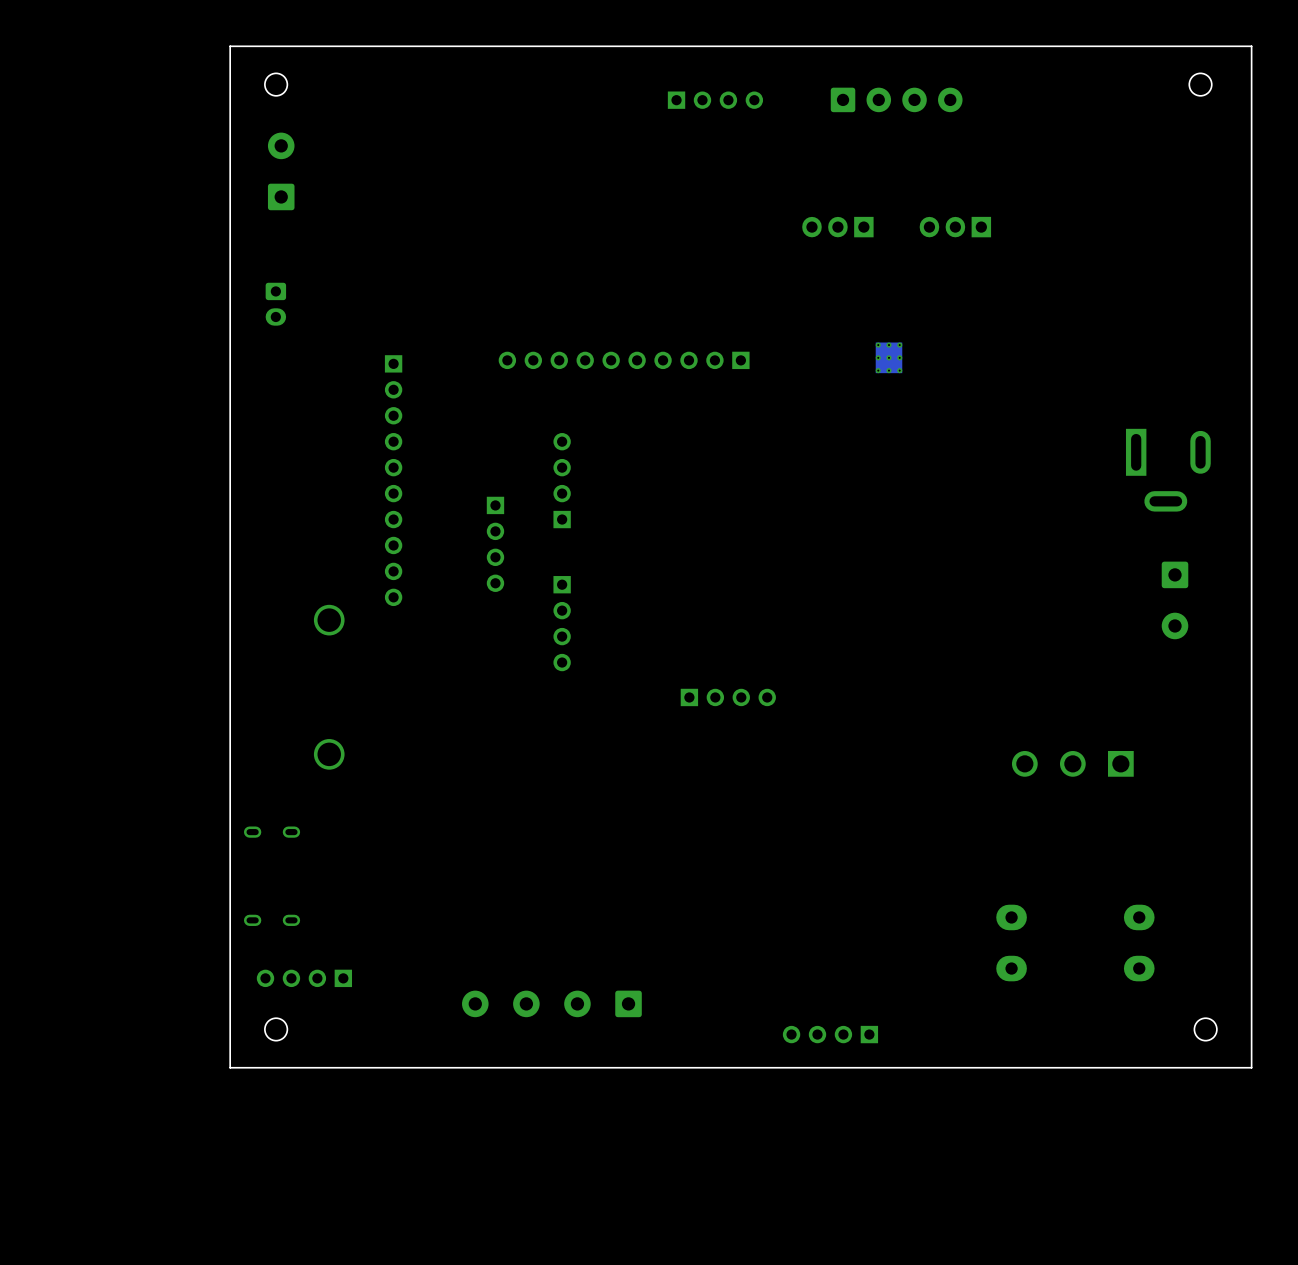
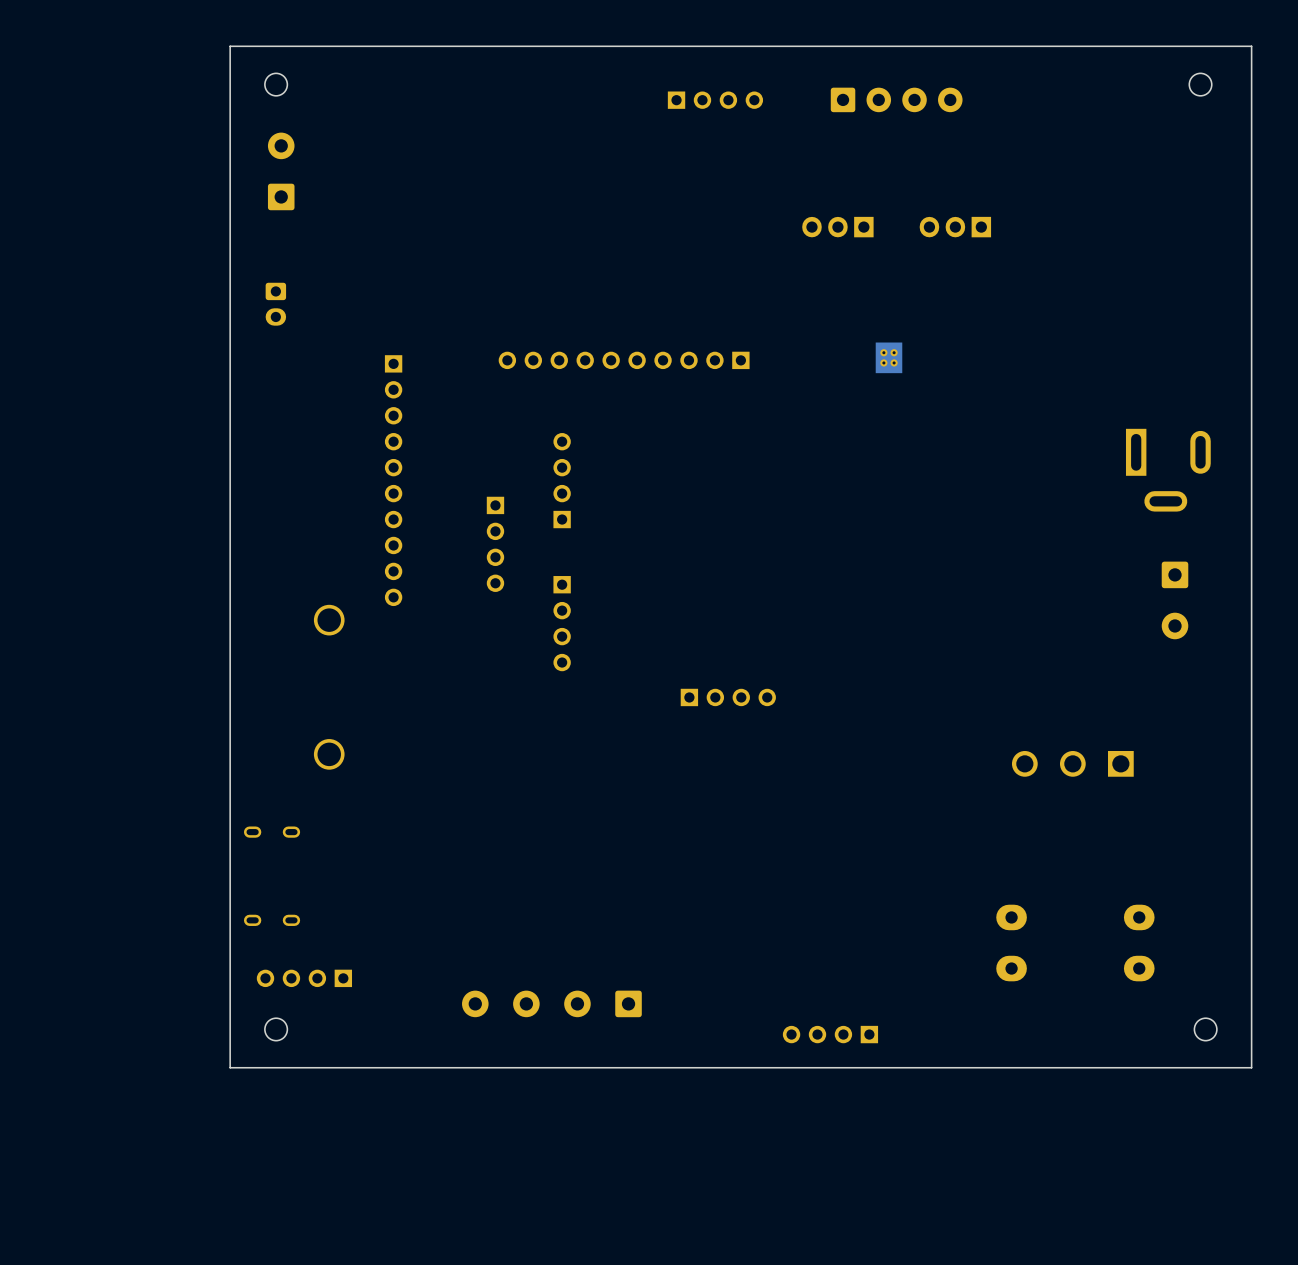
part footprint: [875, 342, 903, 374] -> [875, 342, 903, 374]

